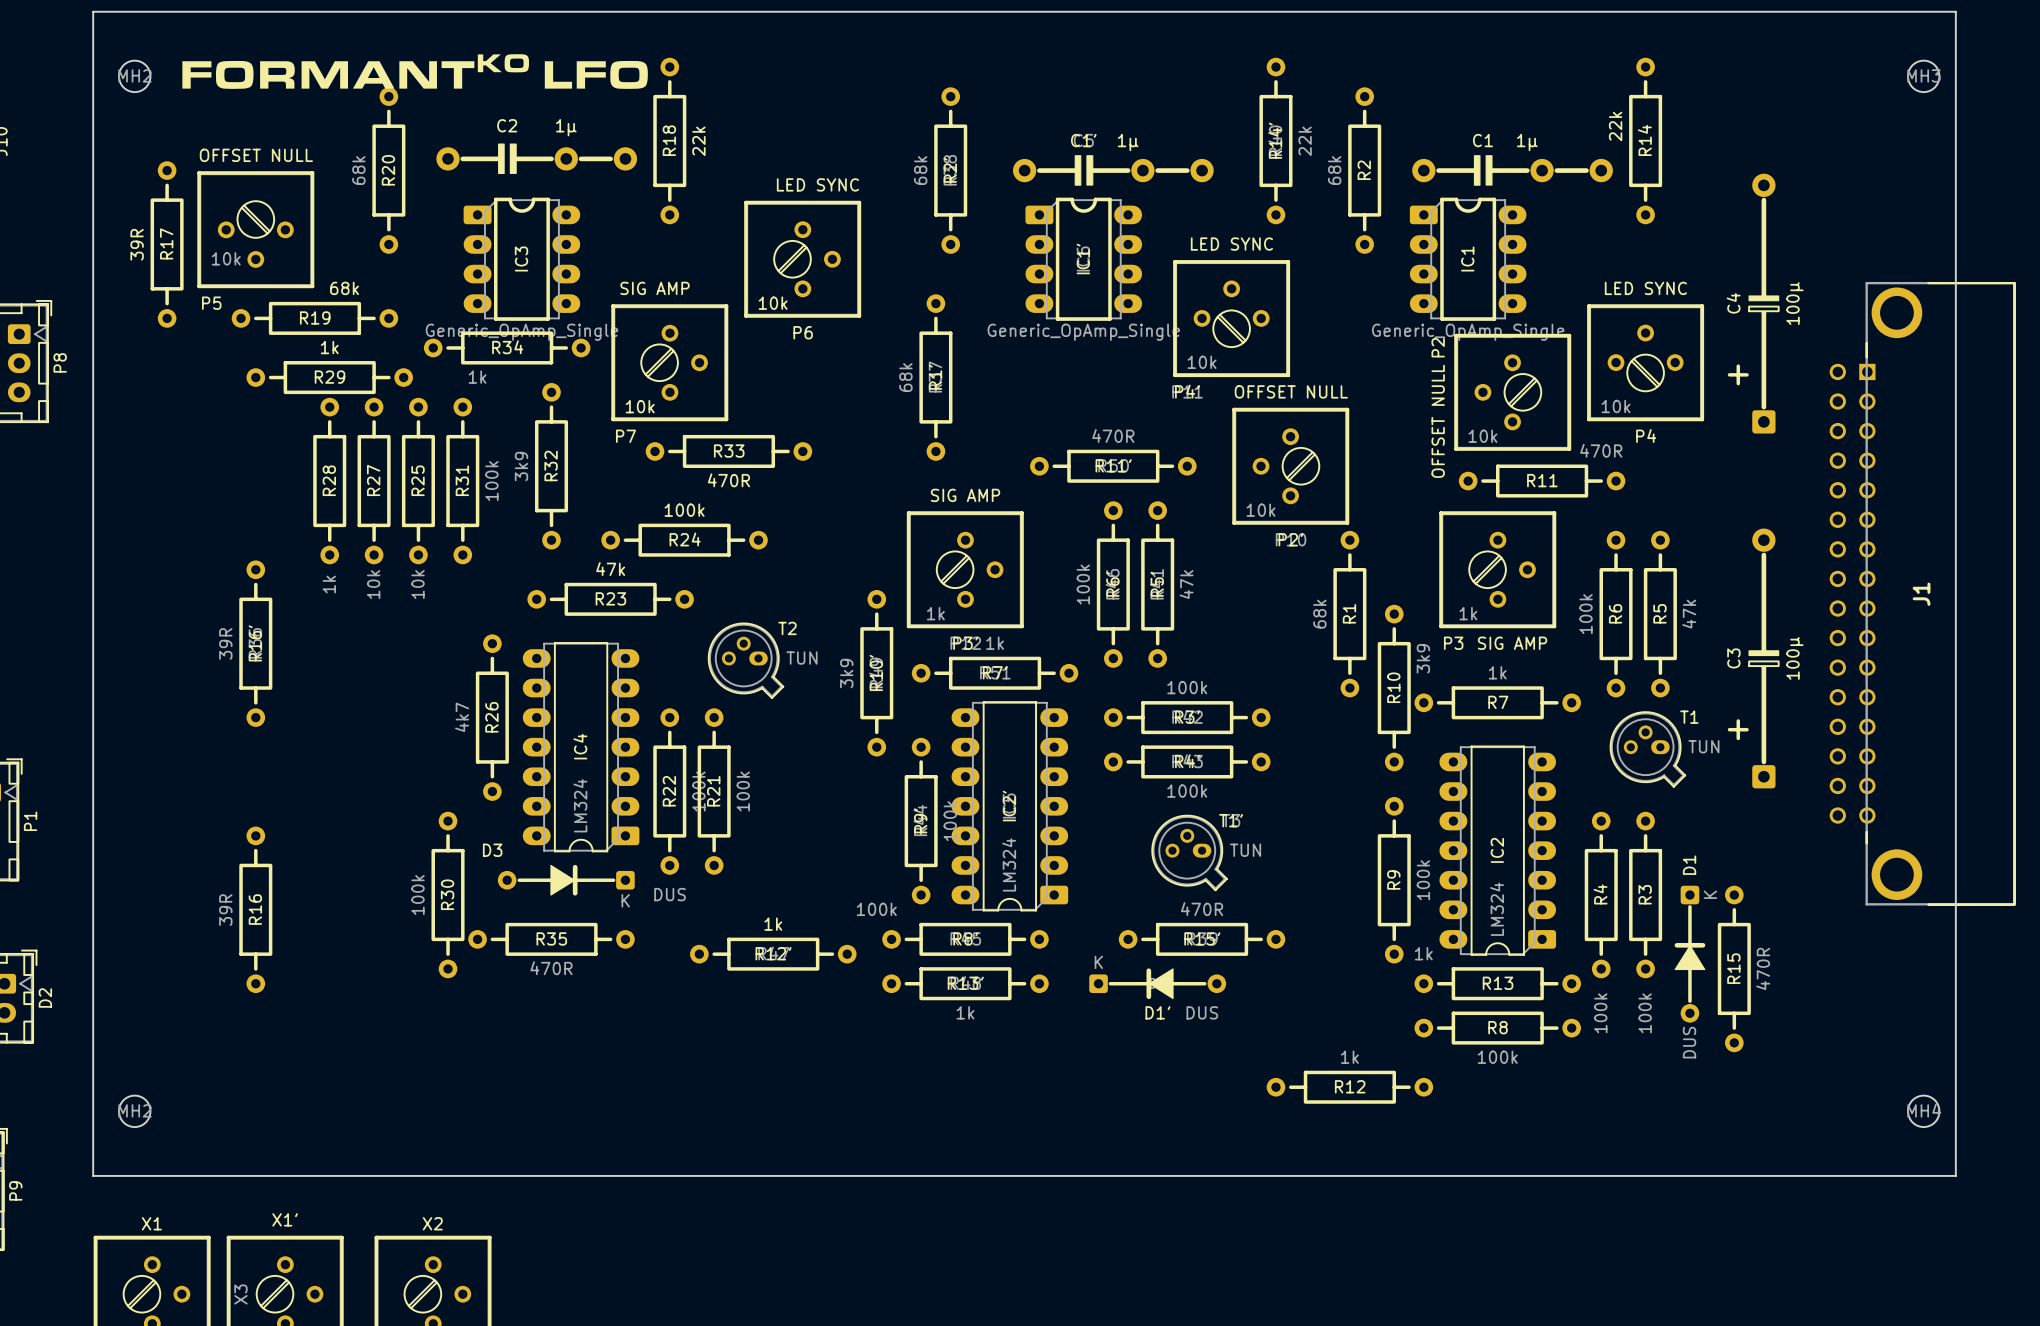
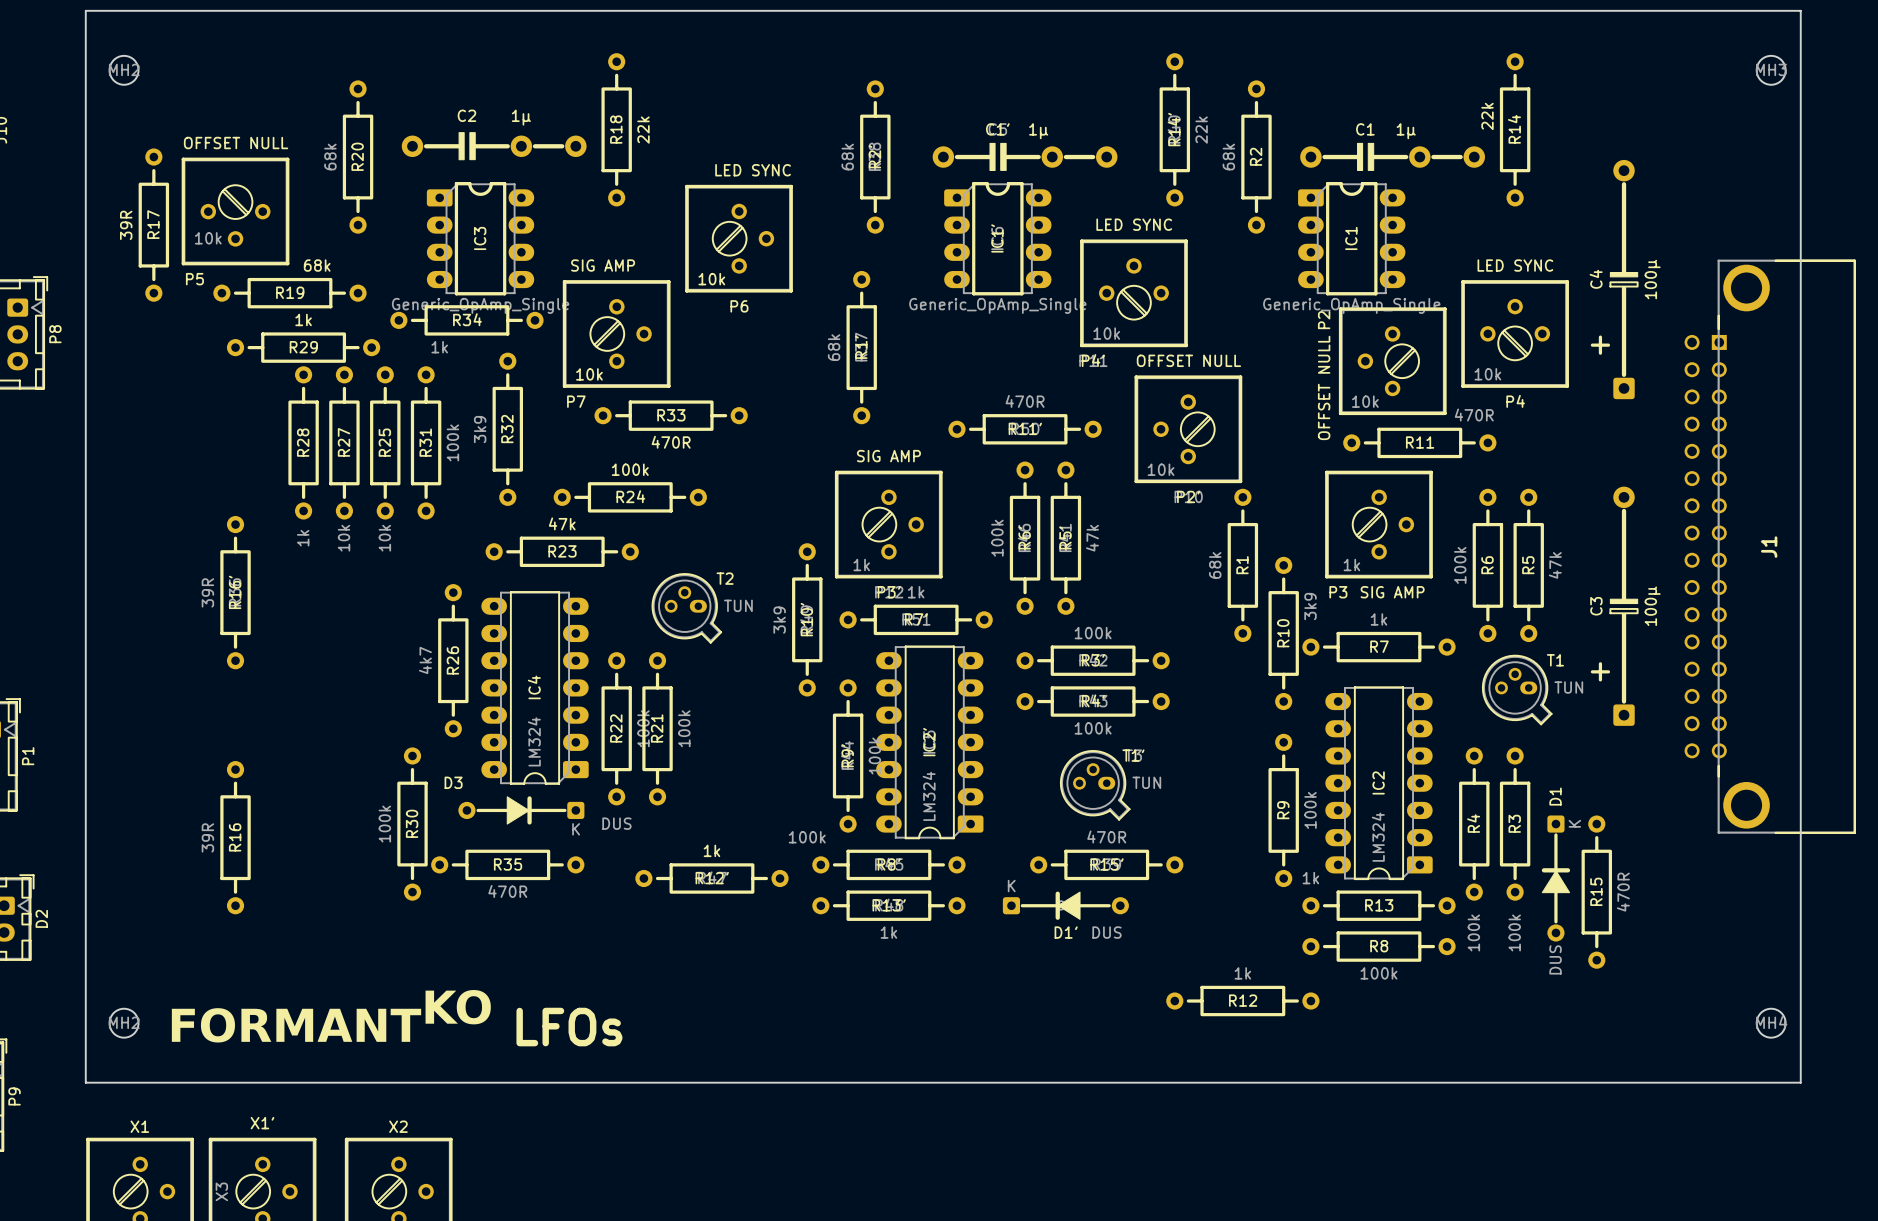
drawing: [182, 54, 530, 89] -> none
drawing: [544, 60, 648, 89] -> none
drawing: none -> [171, 990, 491, 1043]
text: none -> LFOs (569, 1027)

